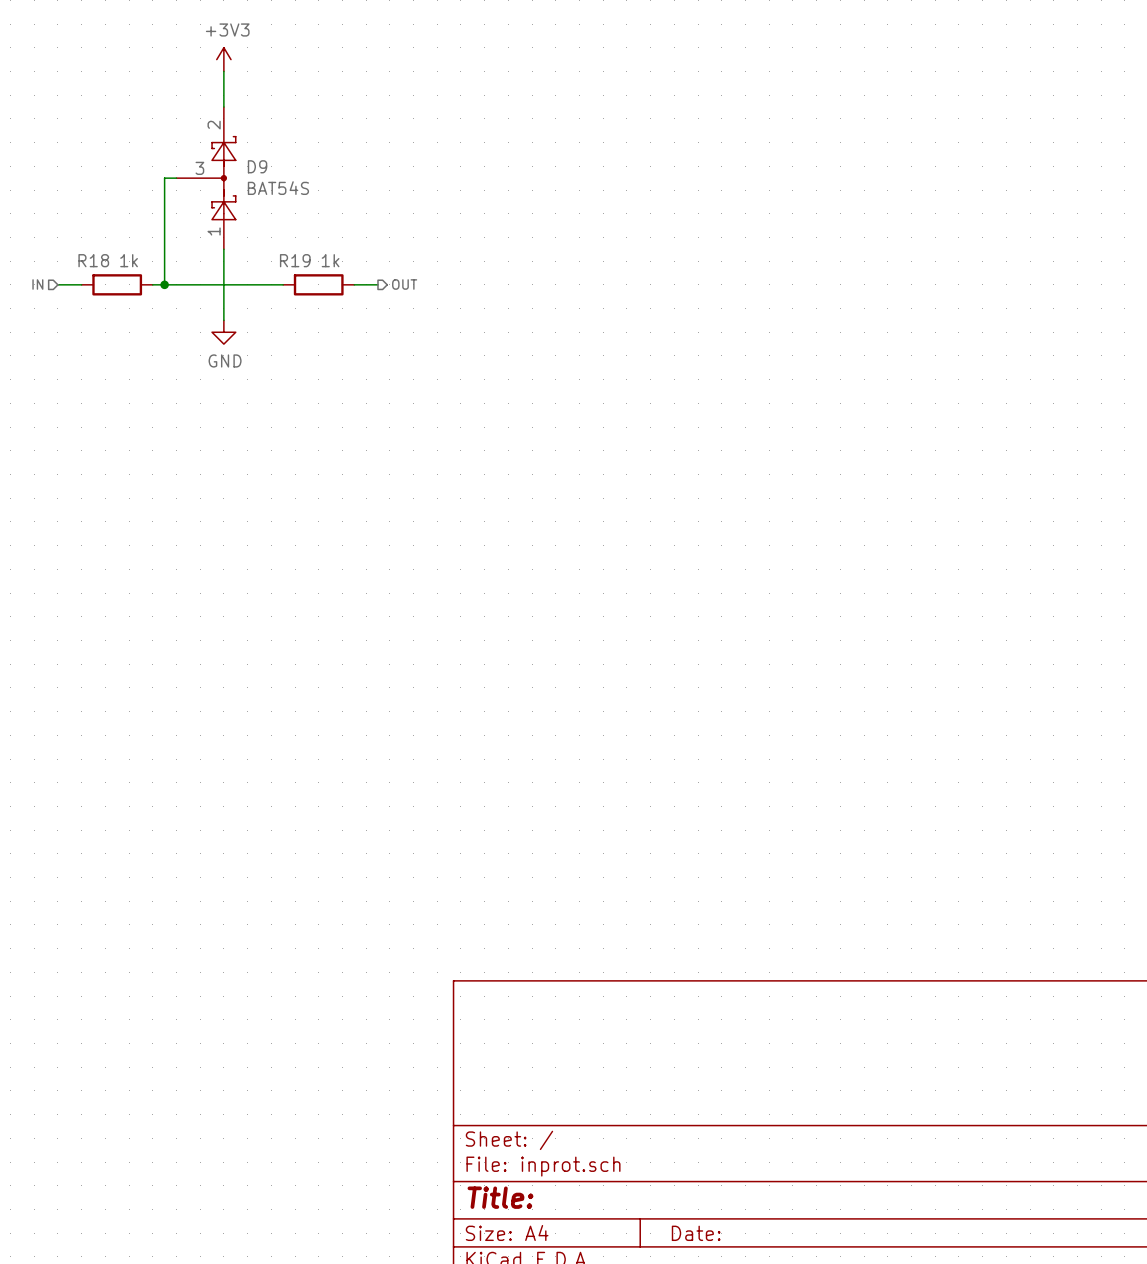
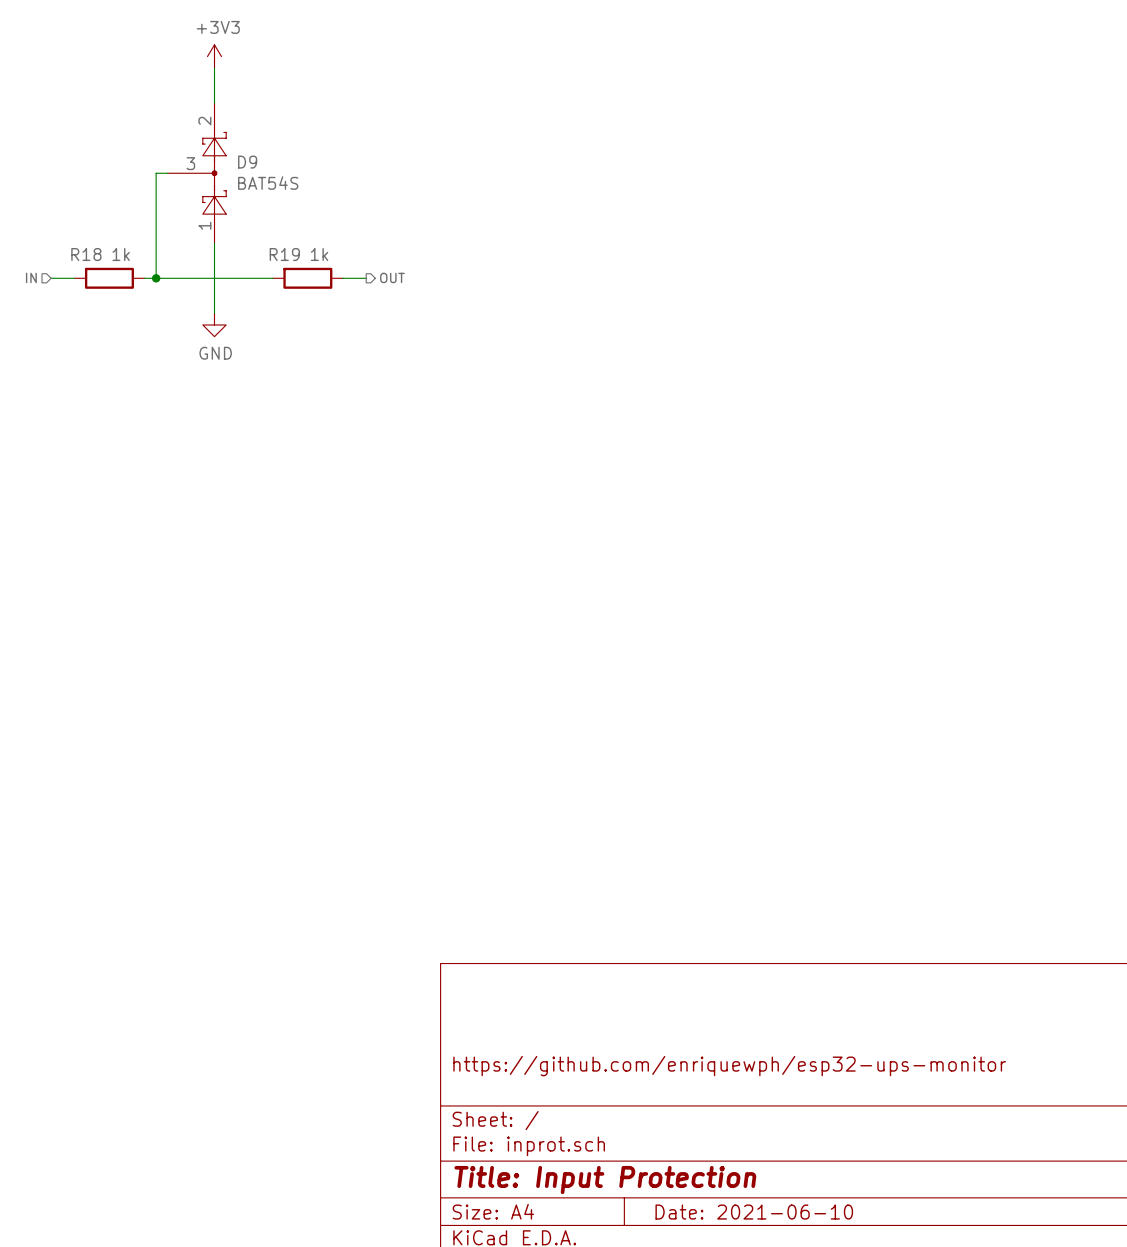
title block: none -> https://github.com/enriquewph/esp32-ups-monitor (729, 1066)
title block: Title: (500, 1197) -> Title: Input Protection (605, 1180)
title block: Date: (696, 1233) -> Date: 2021-06-10 (754, 1212)

